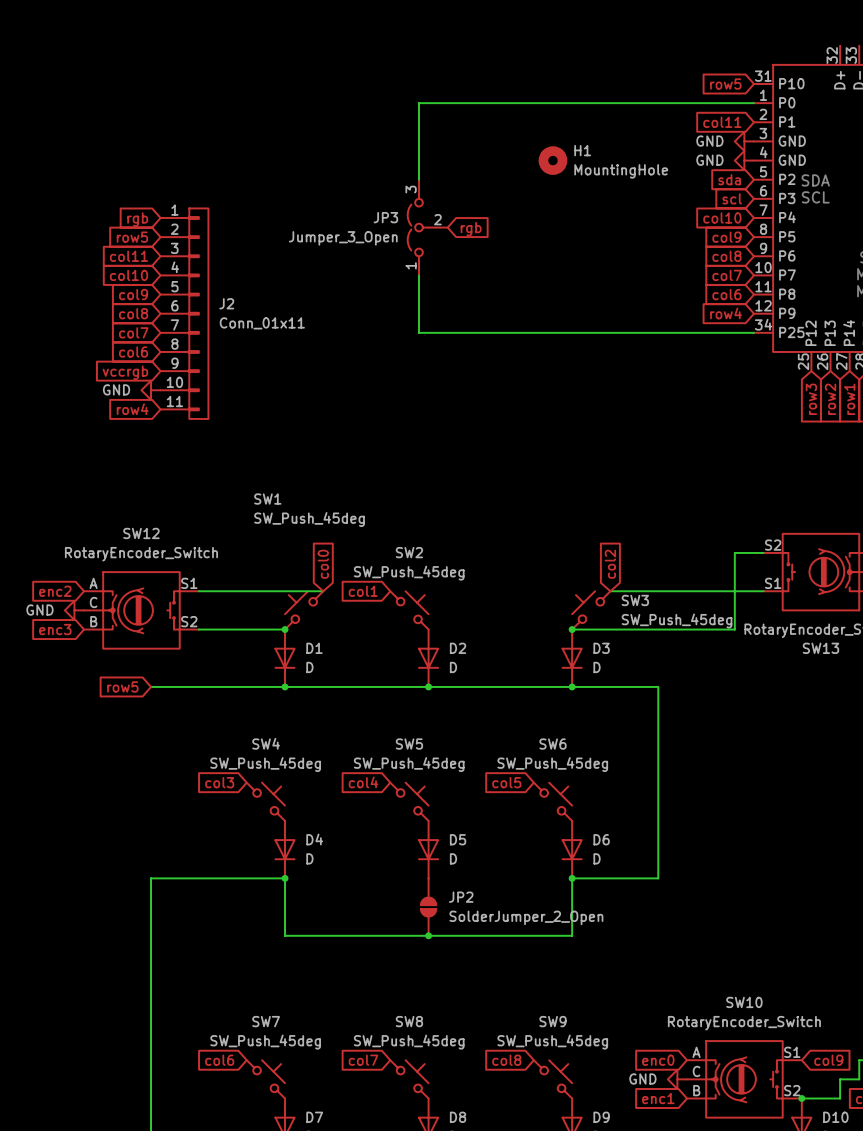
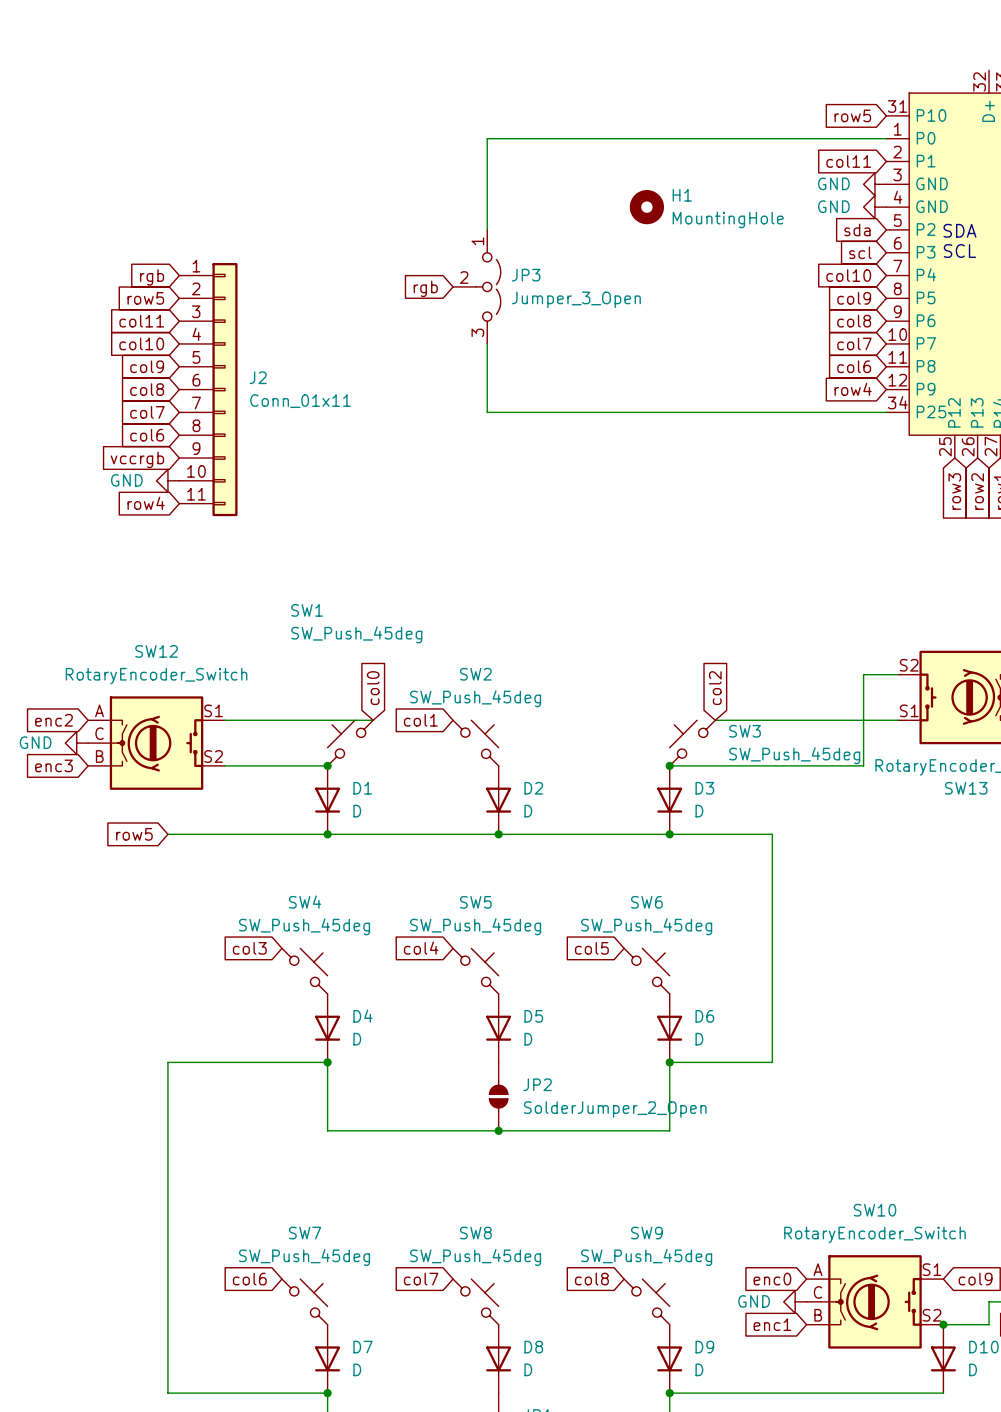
JP3 name position: JP3 (385, 217) -> JP3 (526, 275)
JP3 rotation: 0° (418, 227) -> 180° (488, 286)
global label rotation: 0° (471, 229) -> 180° (425, 288)
global label position: rgb (471, 229) -> rgb (425, 288)
JP3 value position: Jumper_3_Open (343, 238) -> Jumper_3_Open (576, 299)

